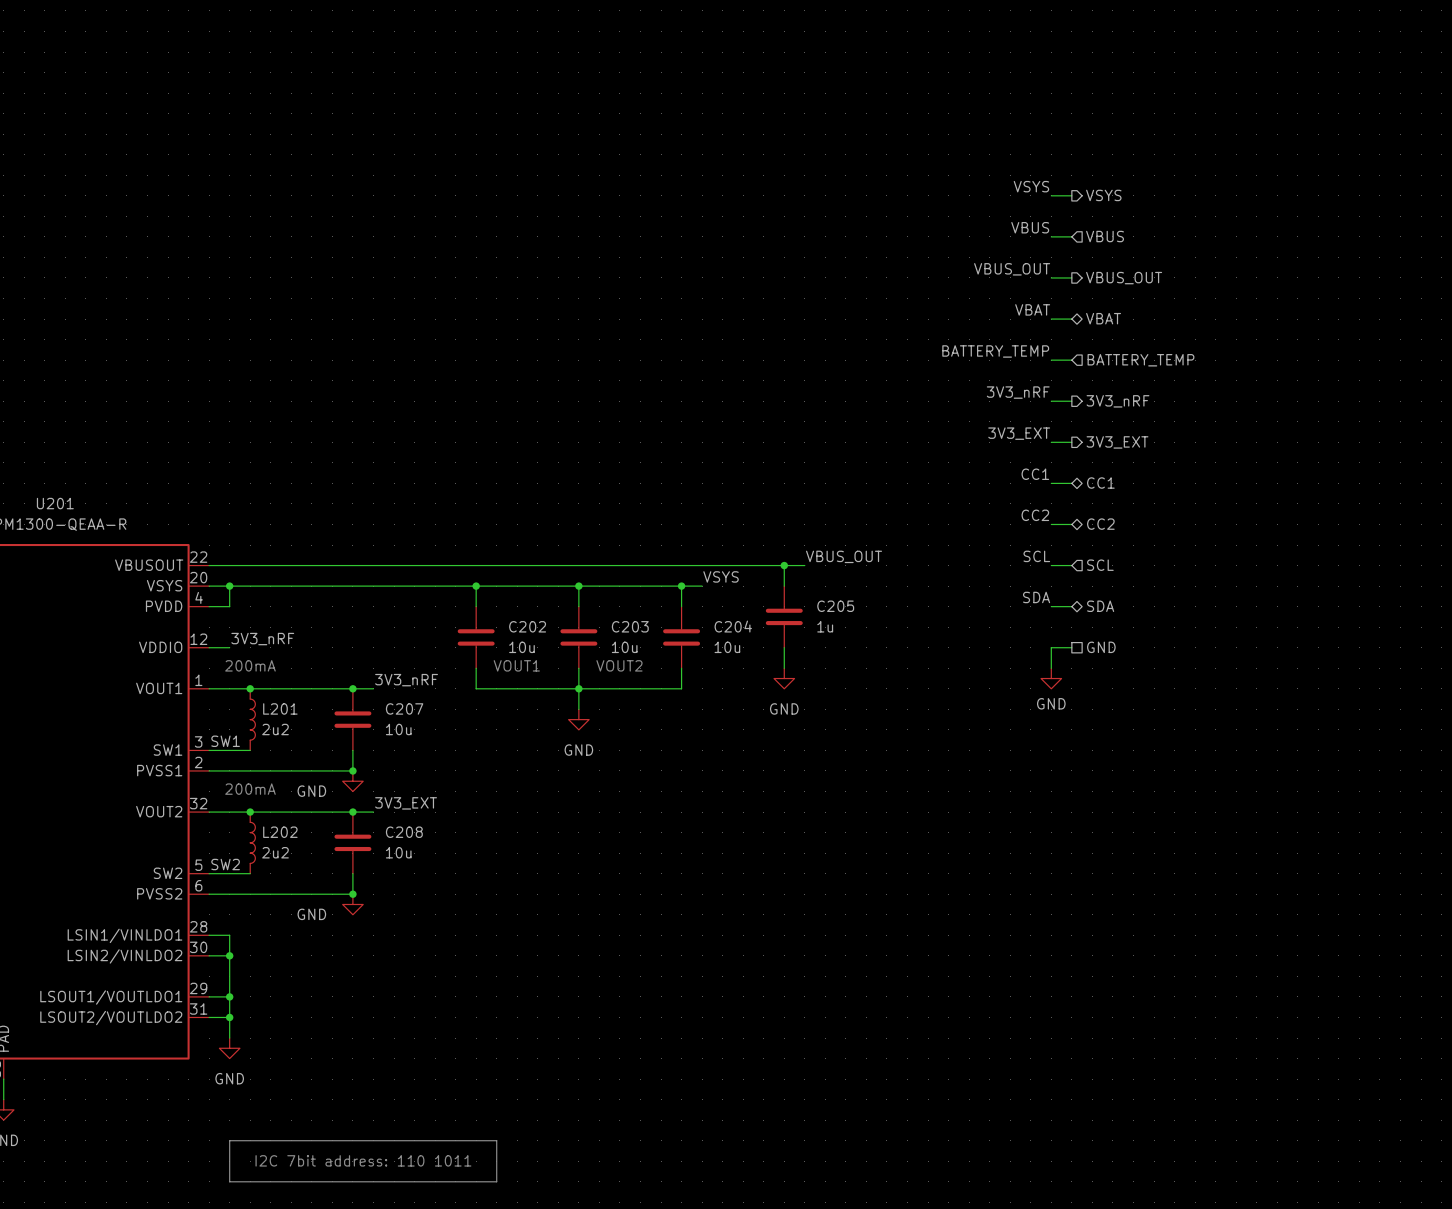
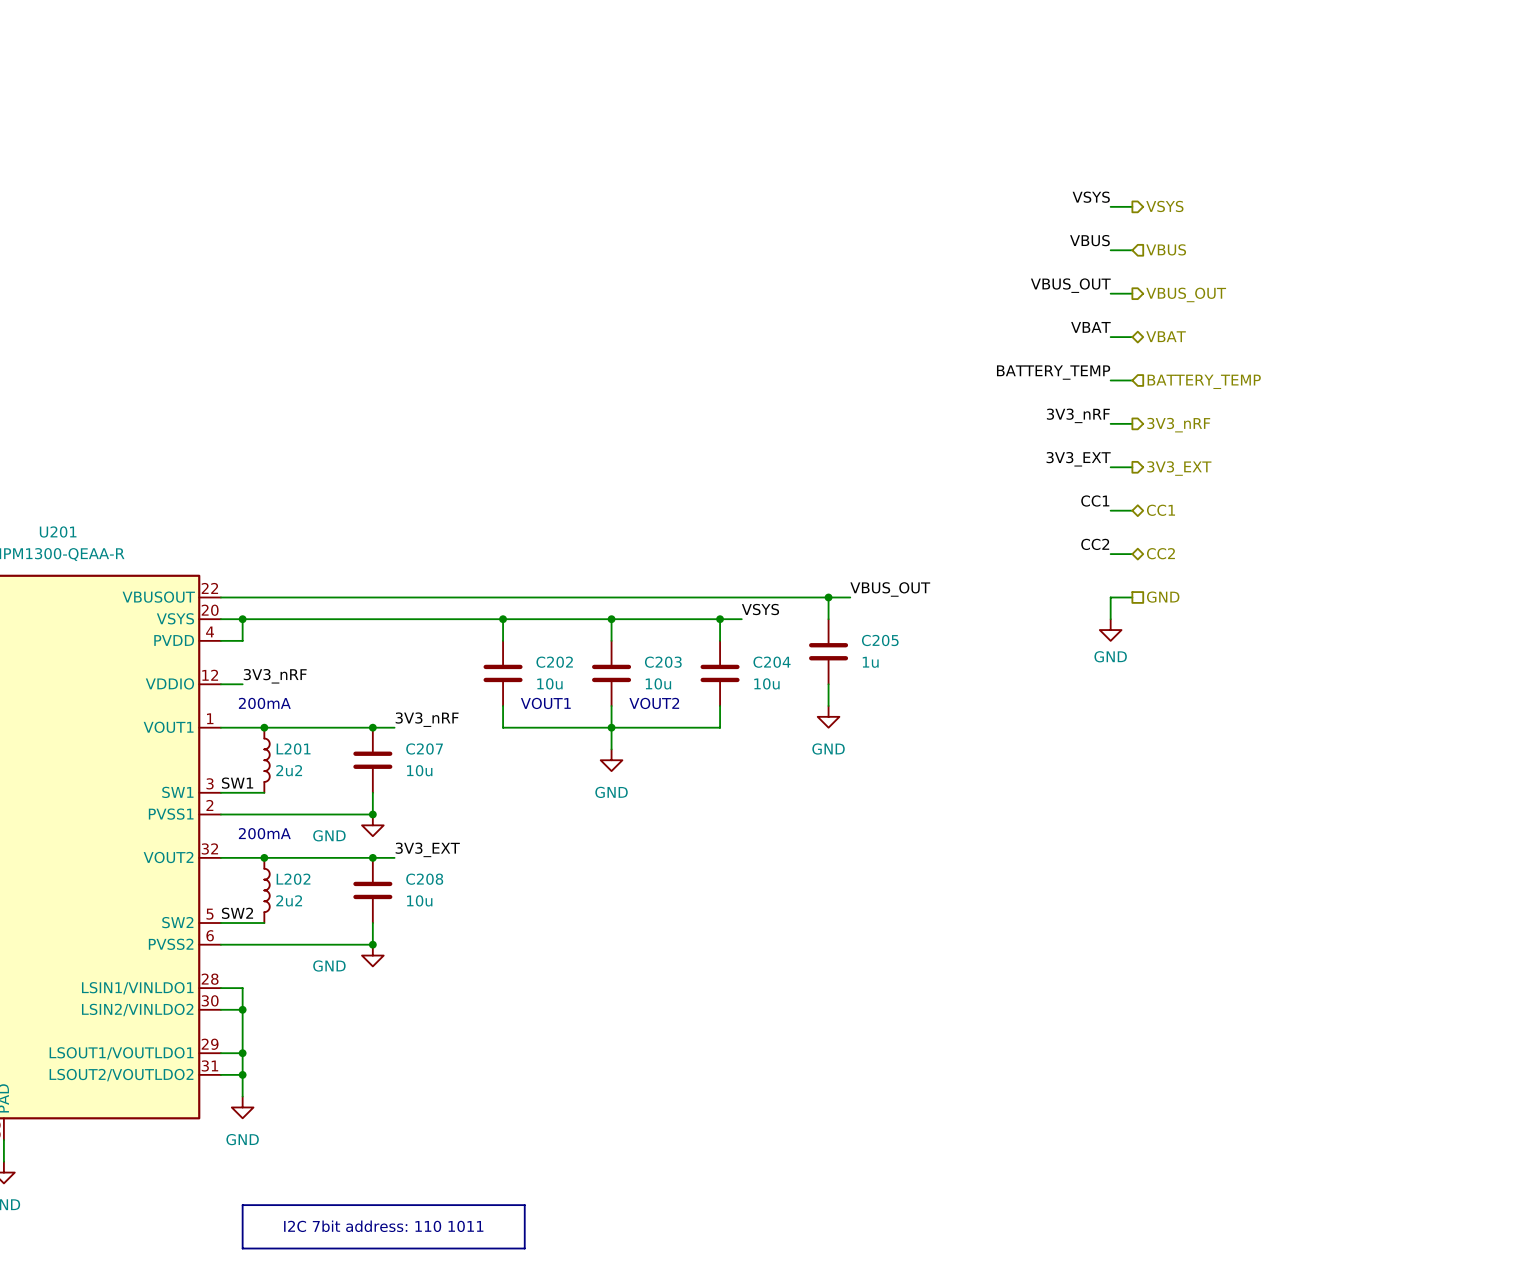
label: SCL (1036, 556) -> none
wire: none -> (1110, 597) (1110, 619)
hierarchical label shape: input (1100, 565) -> passive (1163, 597)
hierarchical label: SCL (1100, 565) -> GND (1163, 597)
label: SDA (1036, 597) -> none
wire: (1051, 606) (1071, 606) -> none
hierarchical label: SDA (1100, 606) -> none
wire: (1071, 647) (1051, 647) (1051, 668) -> none
hierarchical label: GND (1101, 647) -> none
power symbol position: GND (1051, 678) -> GND (1110, 630)

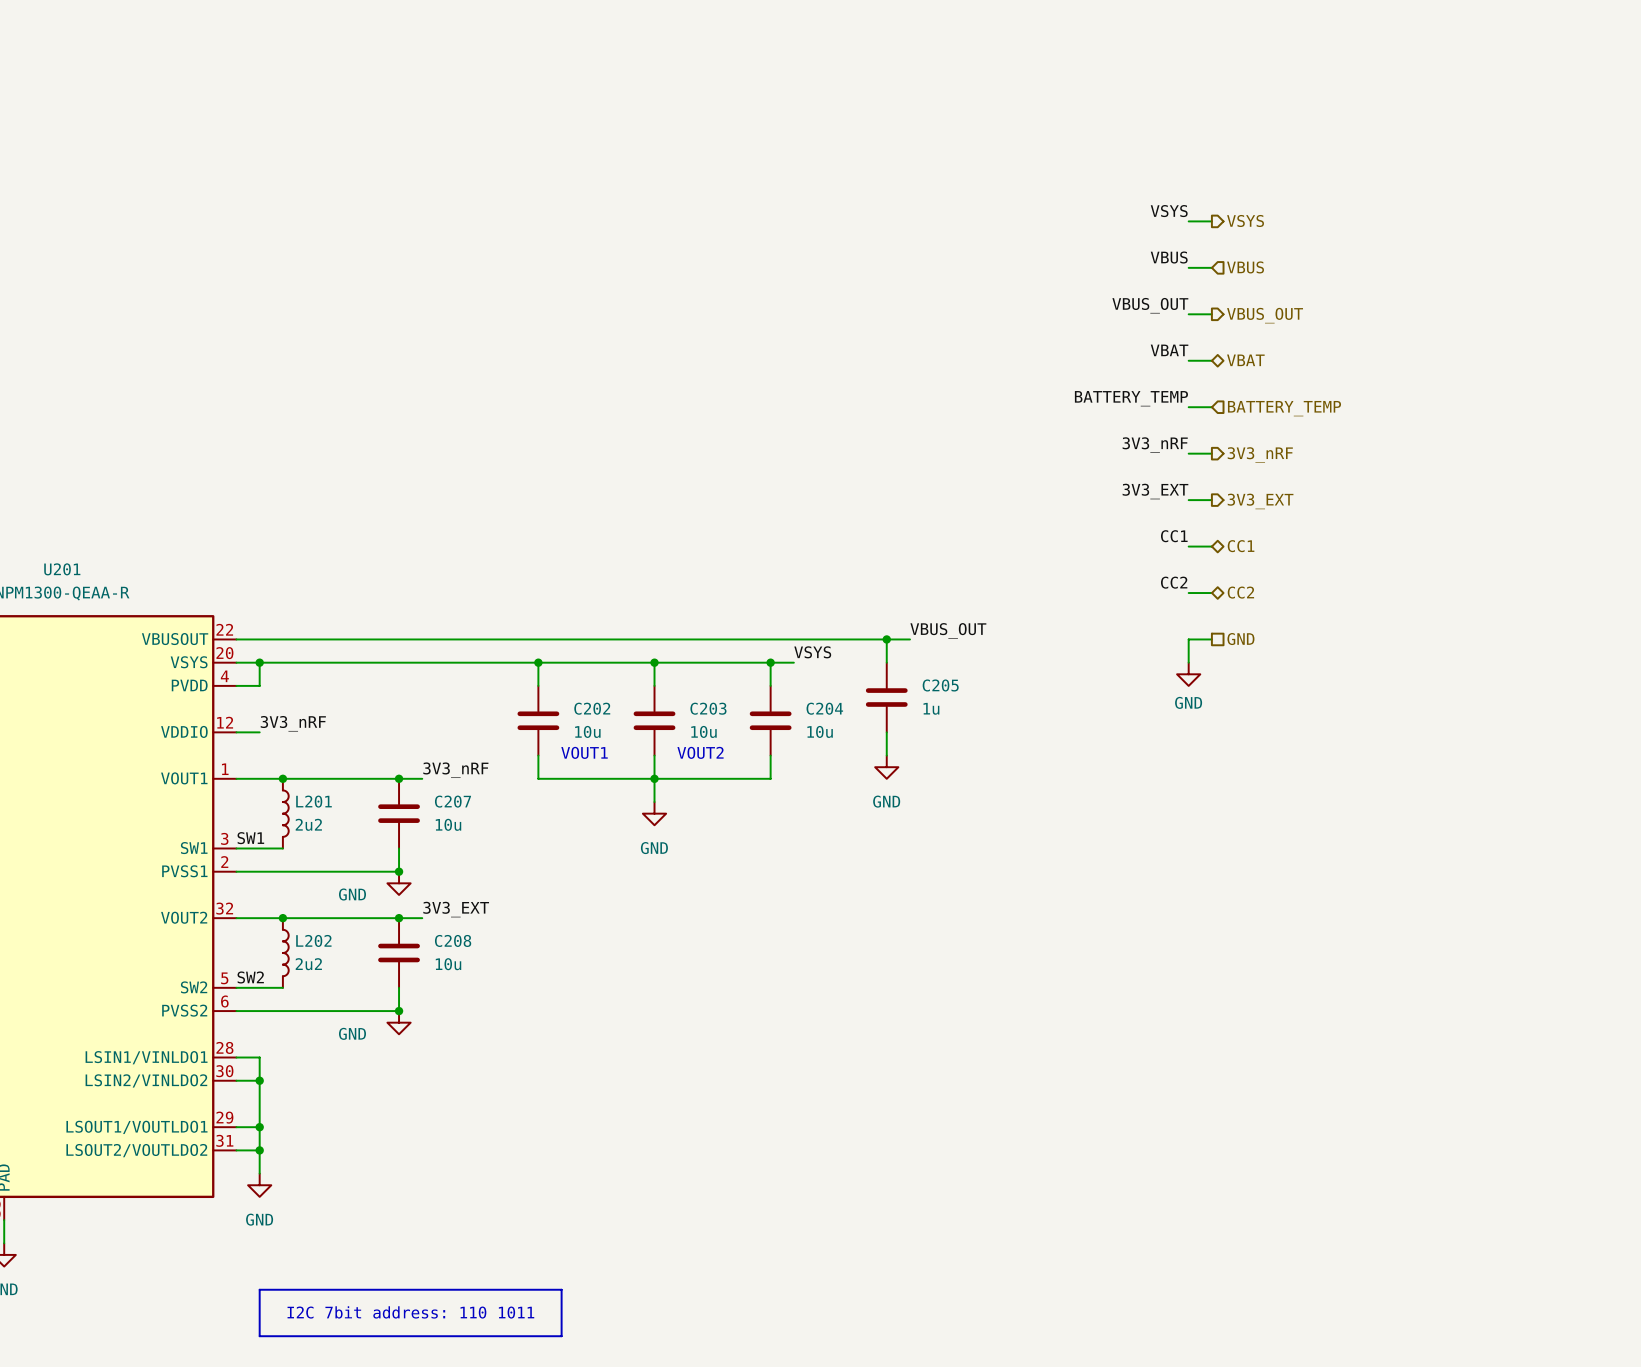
text: 200mA (264, 703) -> none
text: 200mA (264, 833) -> none

